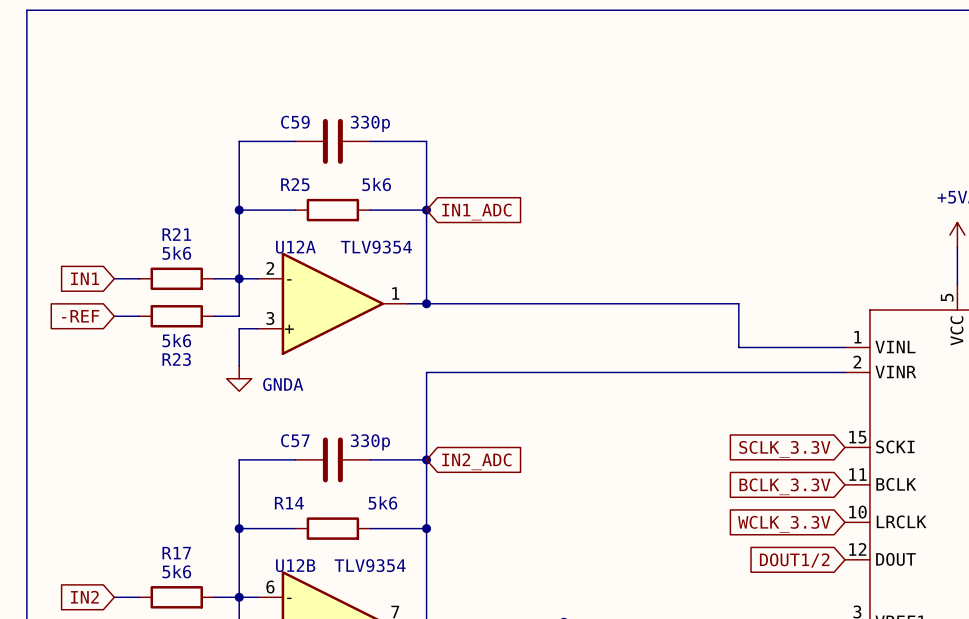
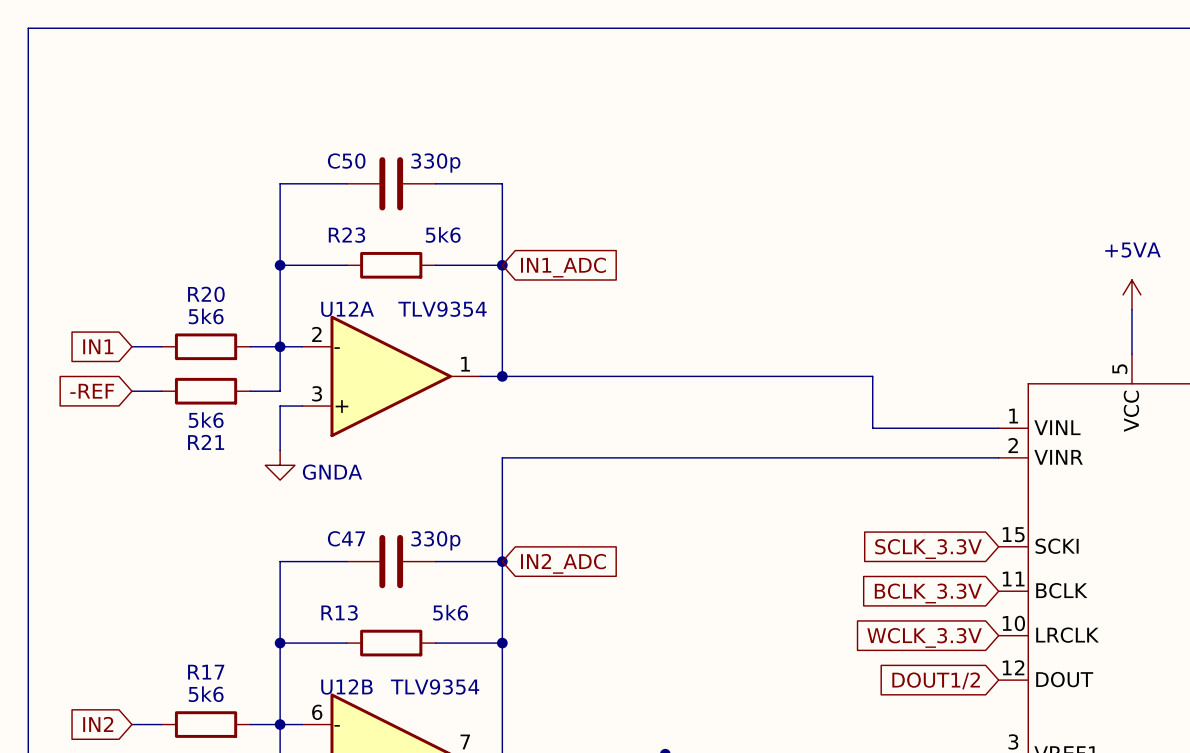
C59 name: C59 (295, 122) -> C50 (346, 161)
R25 name: R25 (295, 184) -> R23 (346, 235)
R21 name: R21 (176, 234) -> R20 (206, 294)
R23 name: R23 (176, 359) -> R21 (206, 442)
C57 name: C57 (295, 440) -> C47 (346, 538)
R14 name: R14 (289, 503) -> R13 (339, 612)

